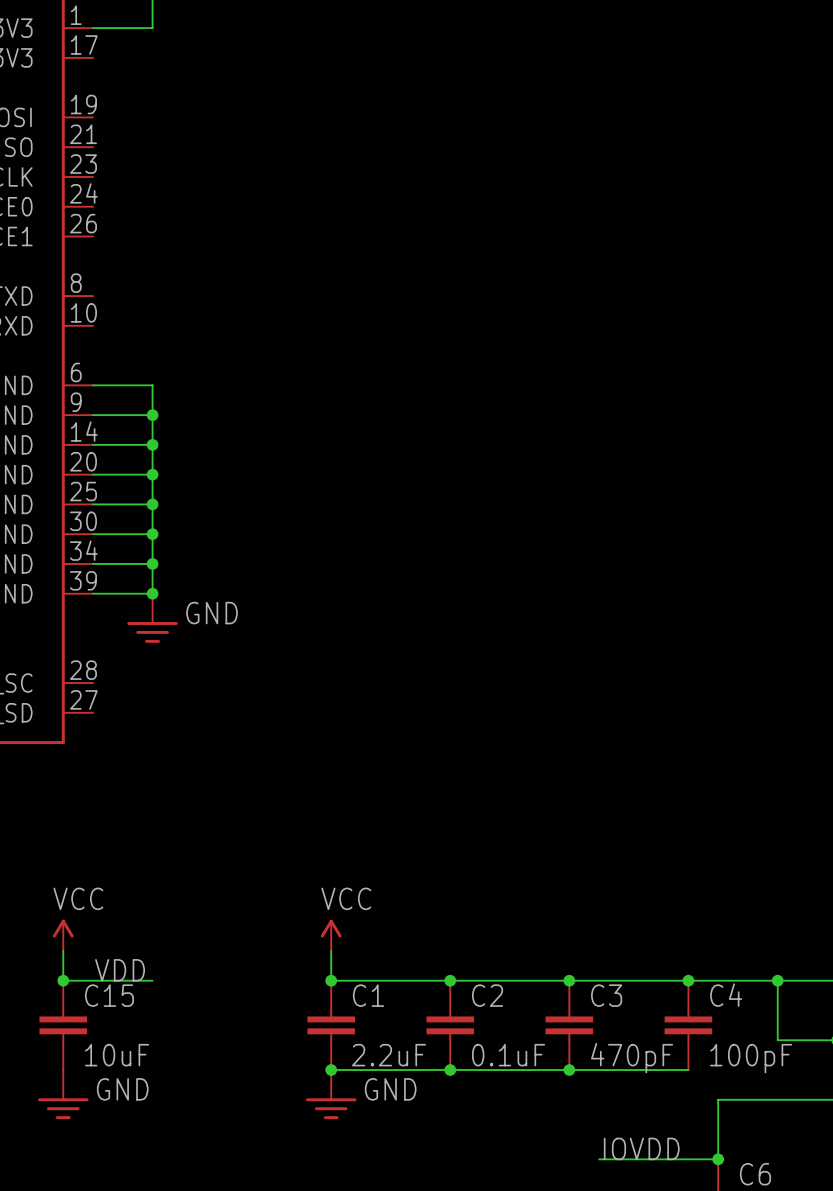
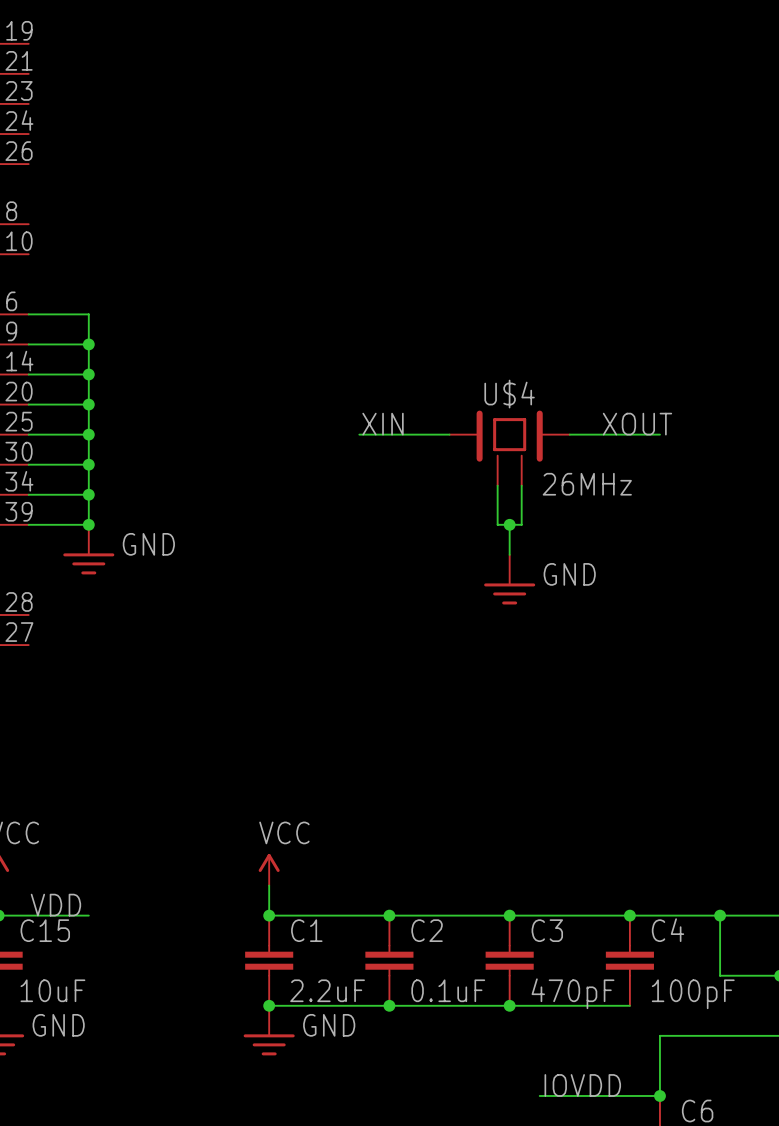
label: none -> XIN (383, 424)
label: none -> XOUT (637, 424)
wire: none -> (359, 434) (449, 434)
wire: none -> (569, 434) (659, 434)
U$4: none -> 26MHz (509, 448)
wire: none -> (497, 485) (497, 524) (521, 524) (521, 485)
wire: none -> (509, 524) (509, 554)
junction: none -> (509, 524)
power symbol: none -> GND (509, 579)

